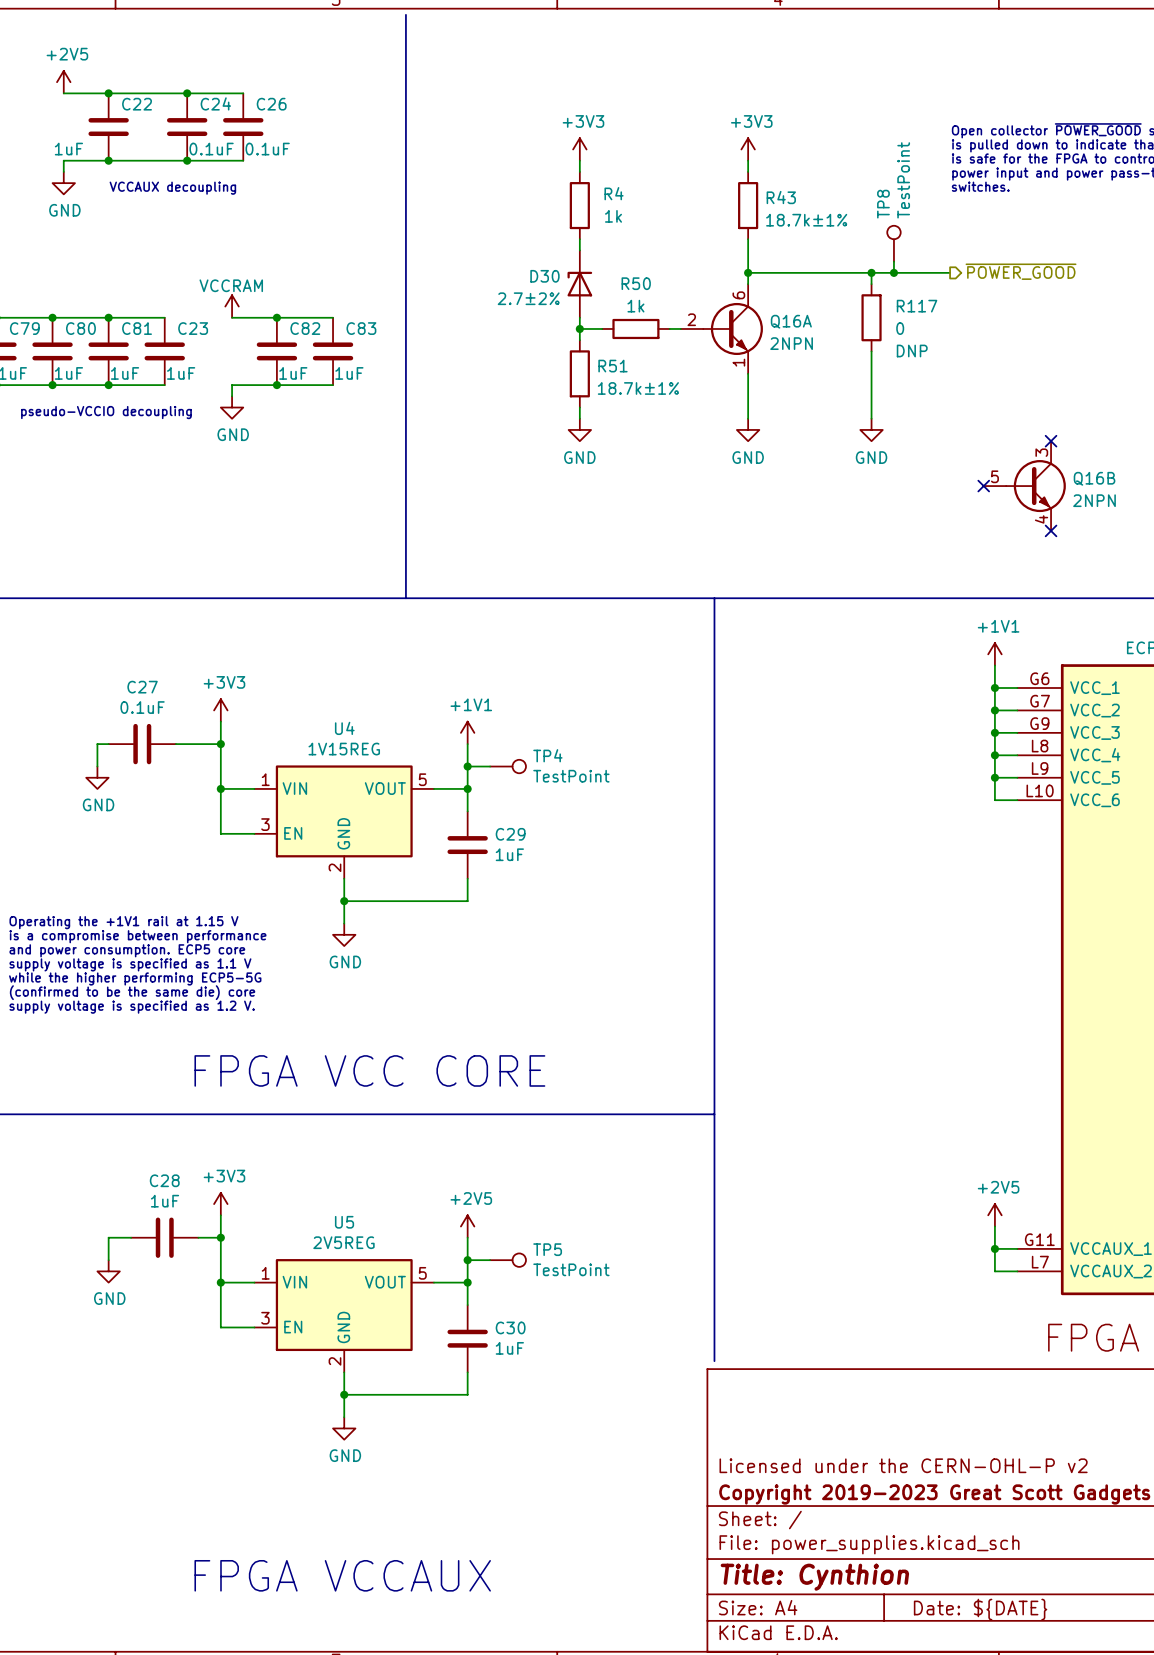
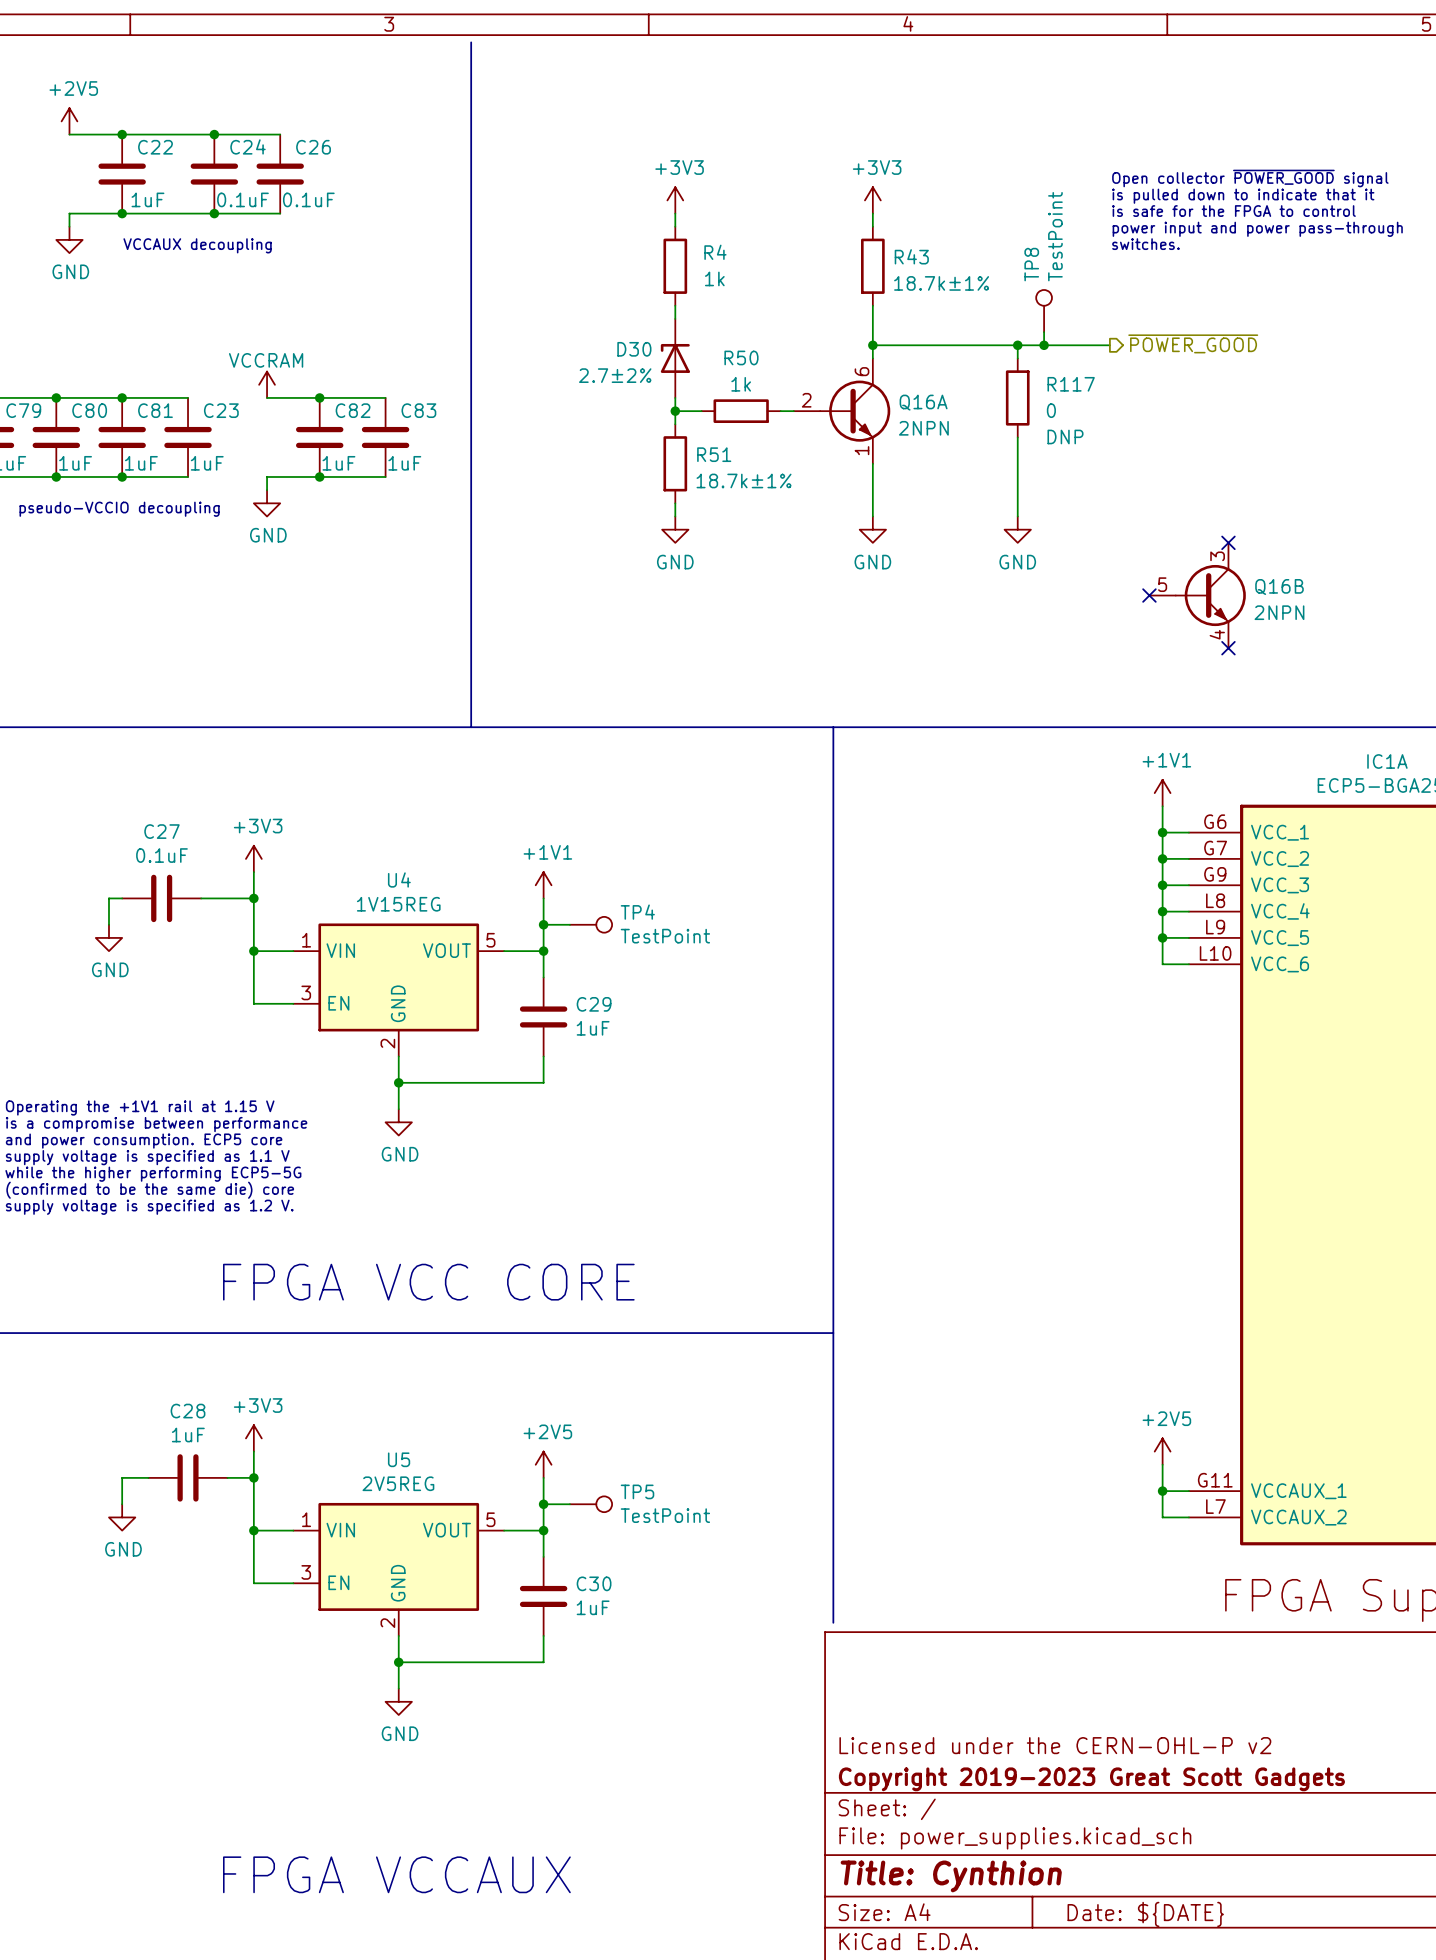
C22 value position: 1uF (68, 149) -> 1uF (147, 199)

